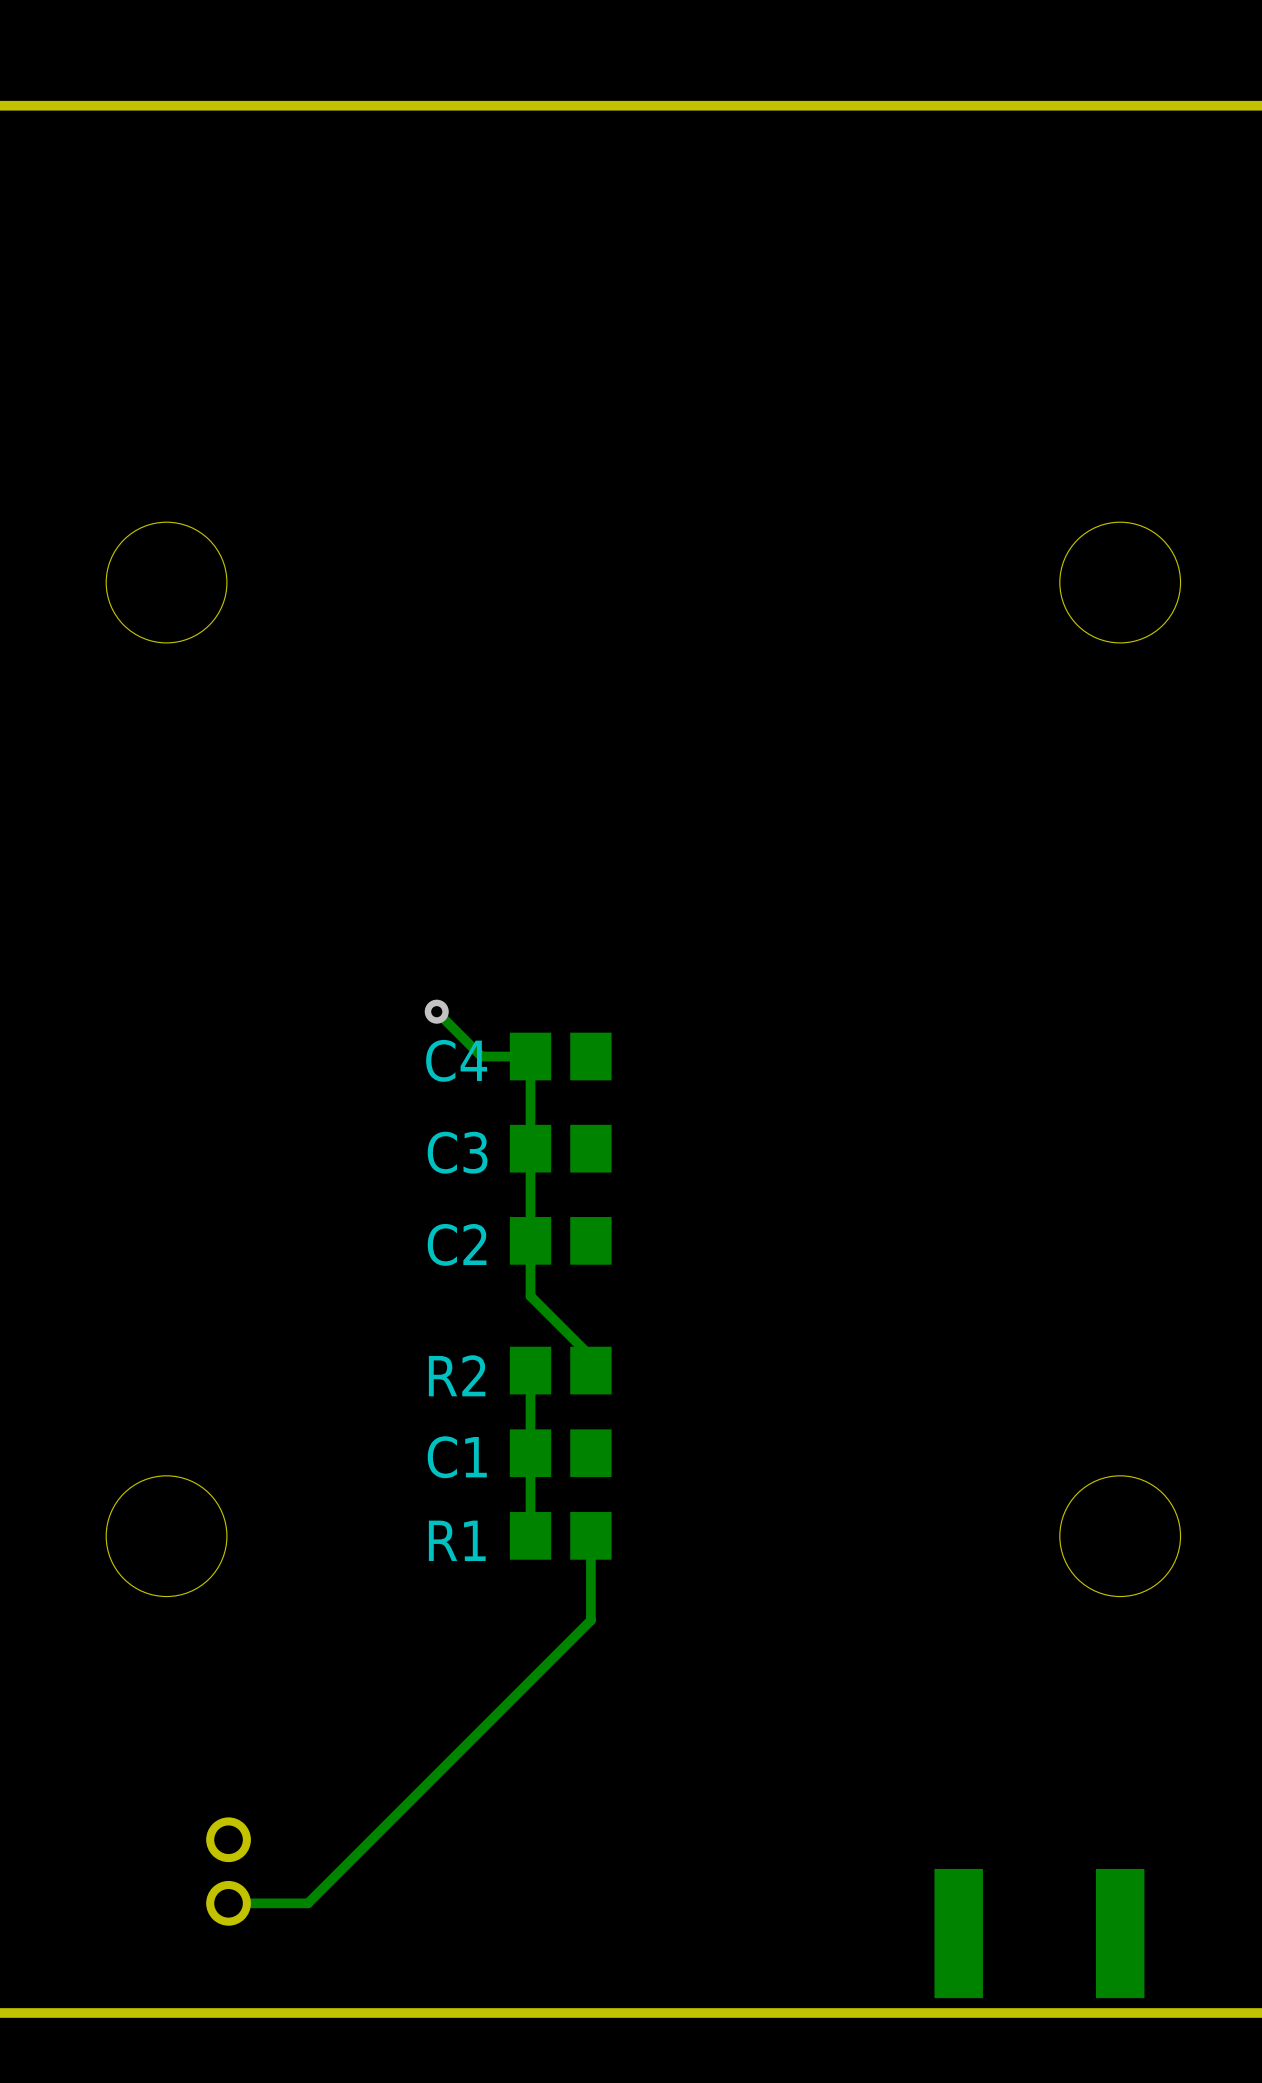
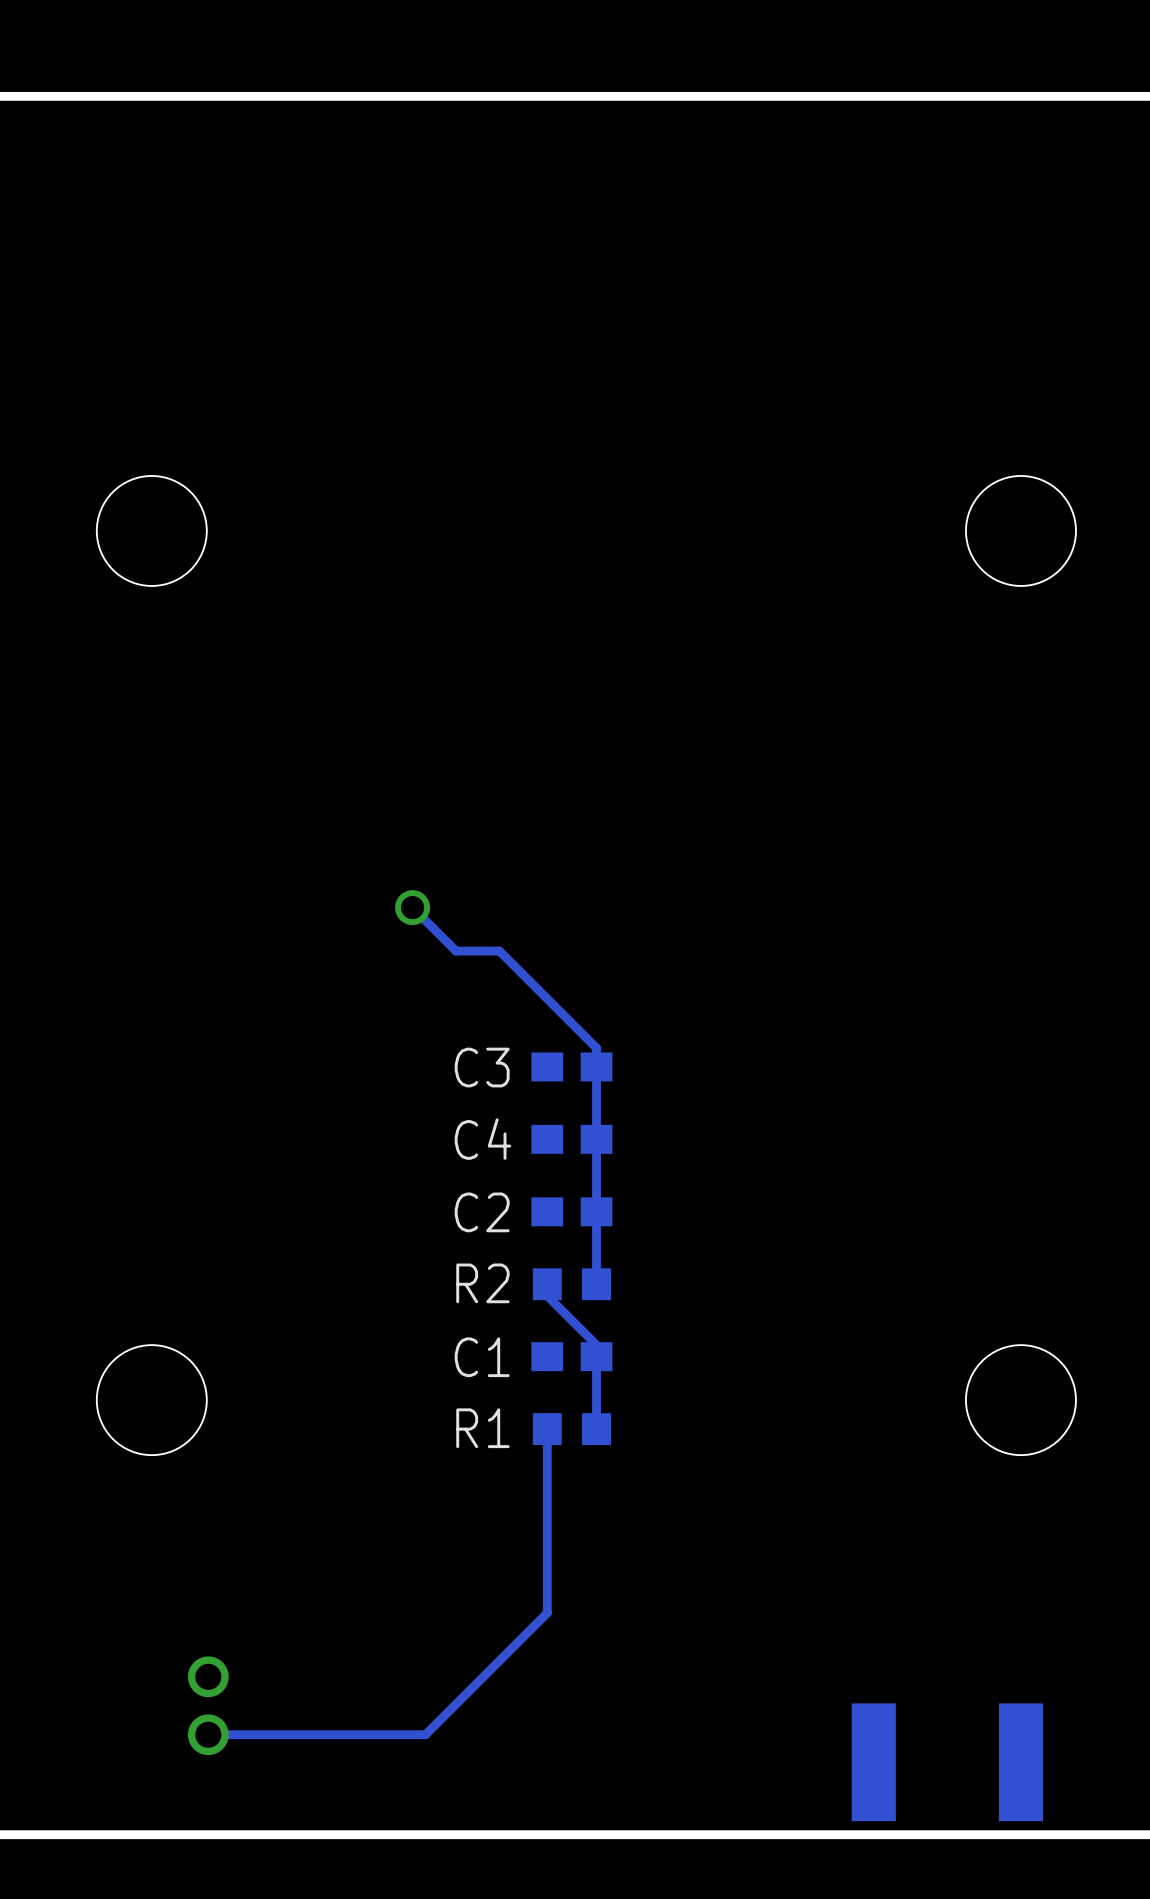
track: none -> (412, 907) (456, 951) (499, 951) (596, 1048) (596, 1284)
via size: [424, 999, 449, 1024] -> [395, 890, 431, 926]
track: (436, 1011) (481, 1056) (530, 1056) (530, 1296) (590, 1356) (590, 1370) -> none
C4 footprint: [509, 1032, 612, 1081] -> [531, 1124, 613, 1154]
C3 footprint: [509, 1124, 612, 1173] -> [531, 1052, 613, 1082]
C2 footprint: [509, 1217, 612, 1265] -> [531, 1197, 613, 1227]
R2 footprint: [509, 1346, 612, 1395] -> [532, 1268, 612, 1301]
track: (530, 1370) (530, 1535) -> none
track: none -> (547, 1284) (547, 1295) (596, 1345) (596, 1429)
C1 footprint: [509, 1429, 612, 1478] -> [531, 1342, 613, 1372]
R1 footprint: [509, 1512, 612, 1560] -> [532, 1413, 612, 1446]
track: (590, 1535) (590, 1620) (308, 1903) -> (547, 1429) (547, 1613) (425, 1734) (280, 1734)

